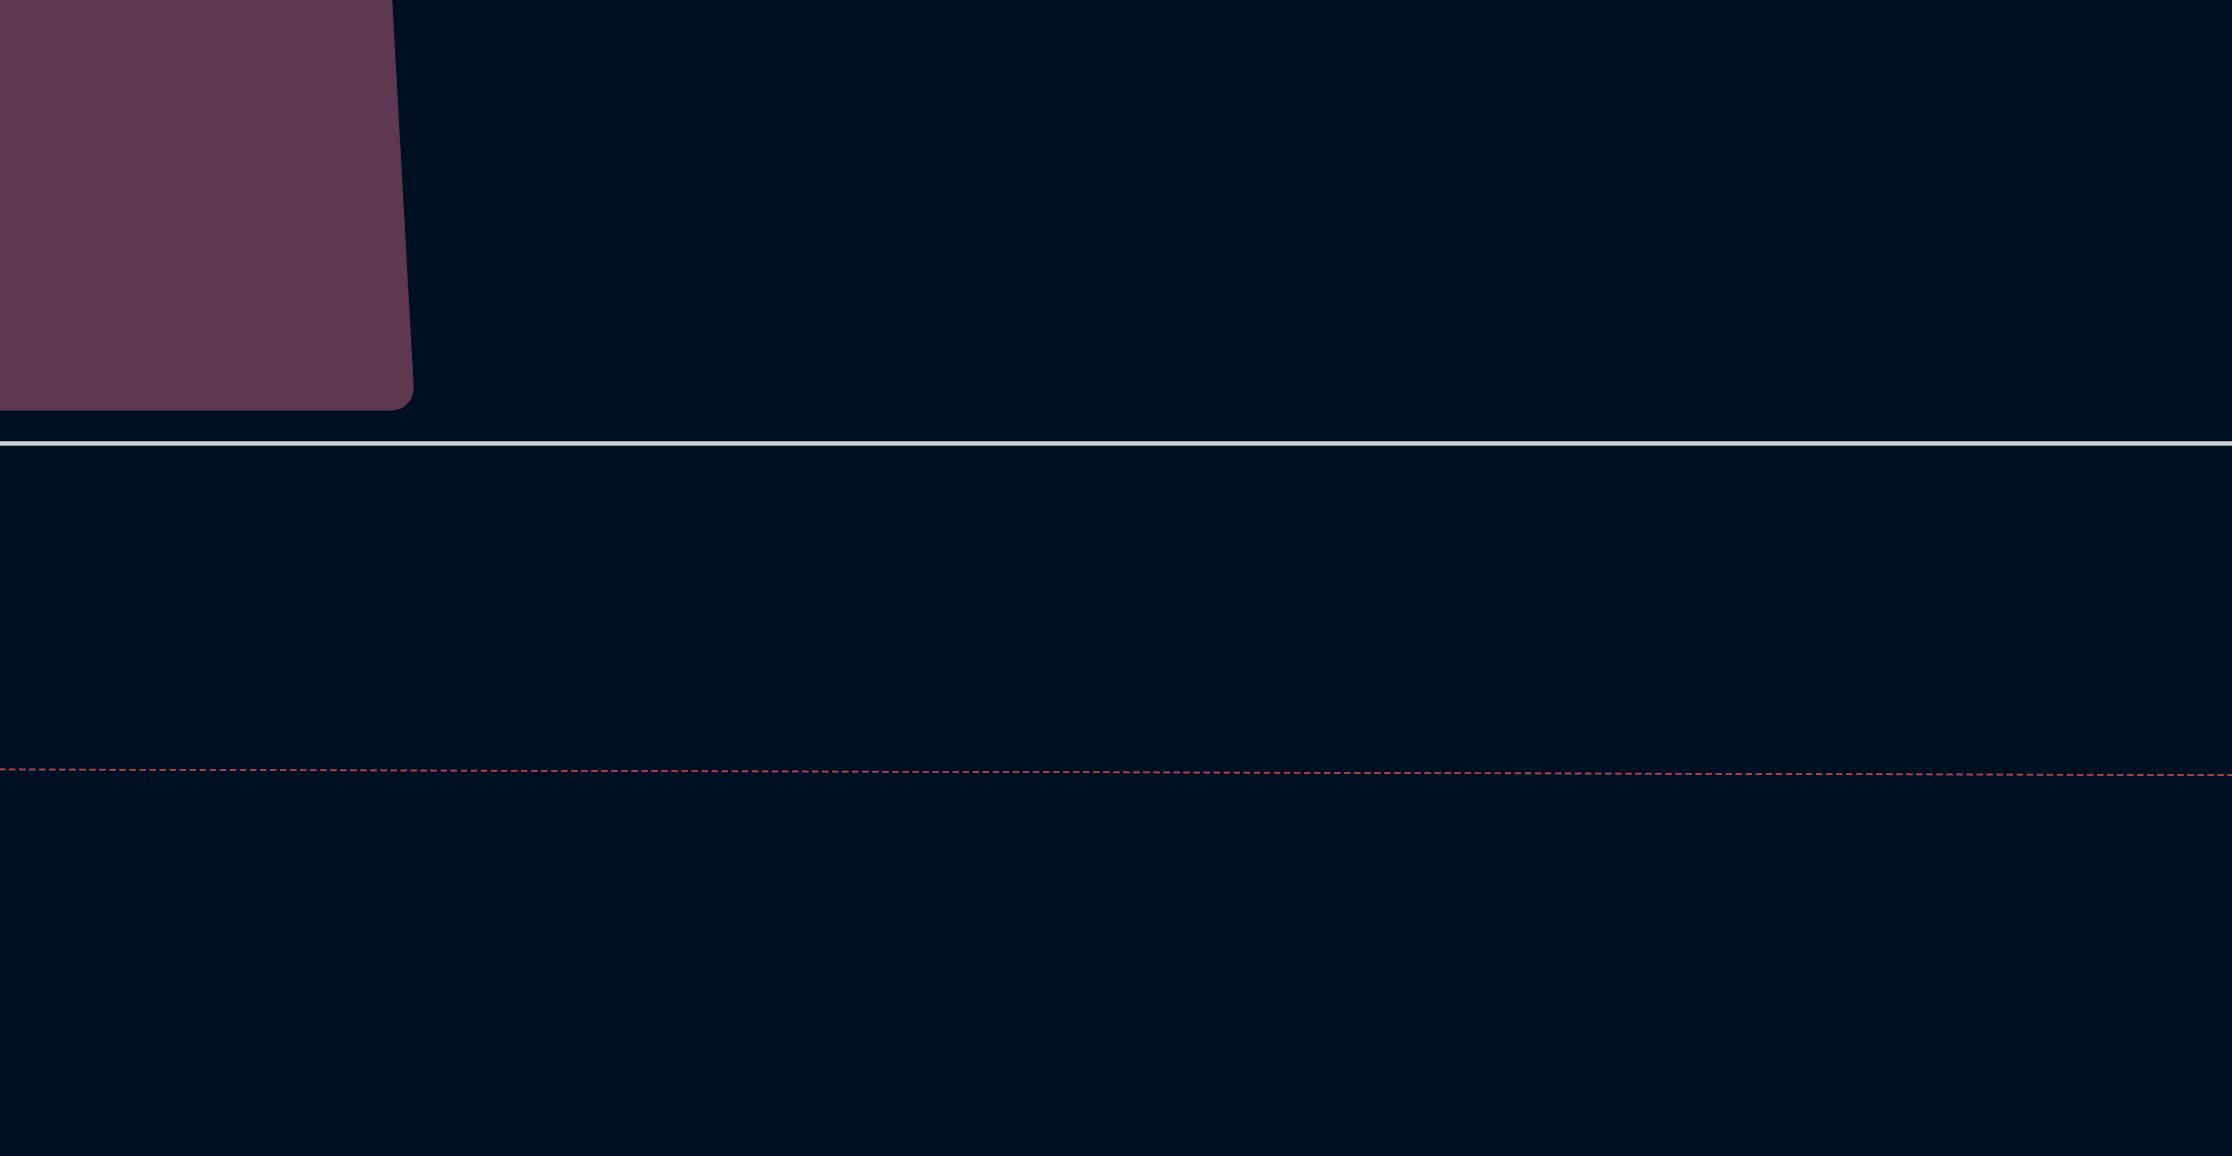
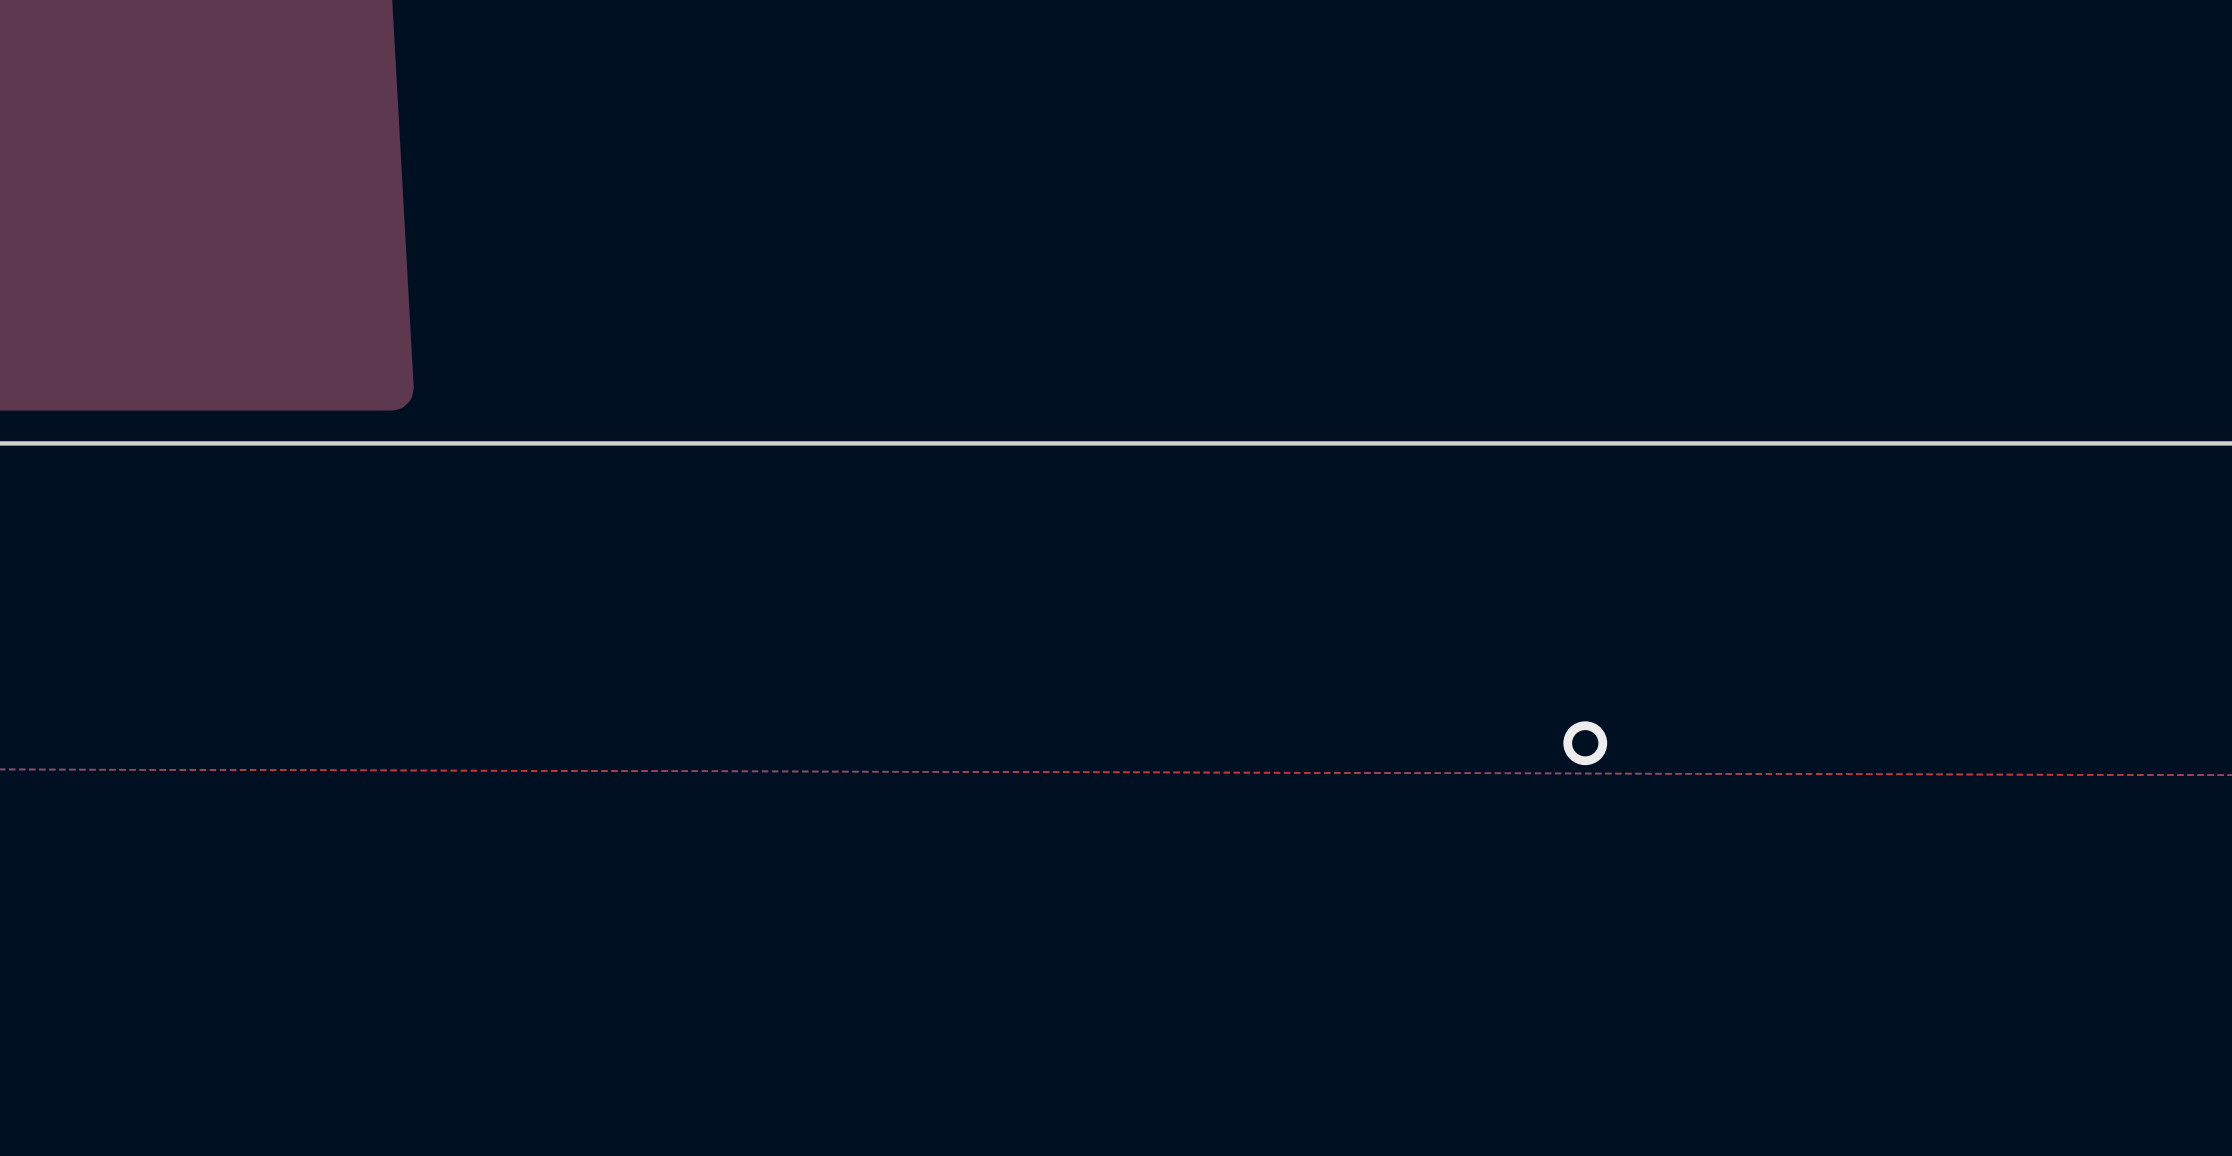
via: none -> (1585, 743)

